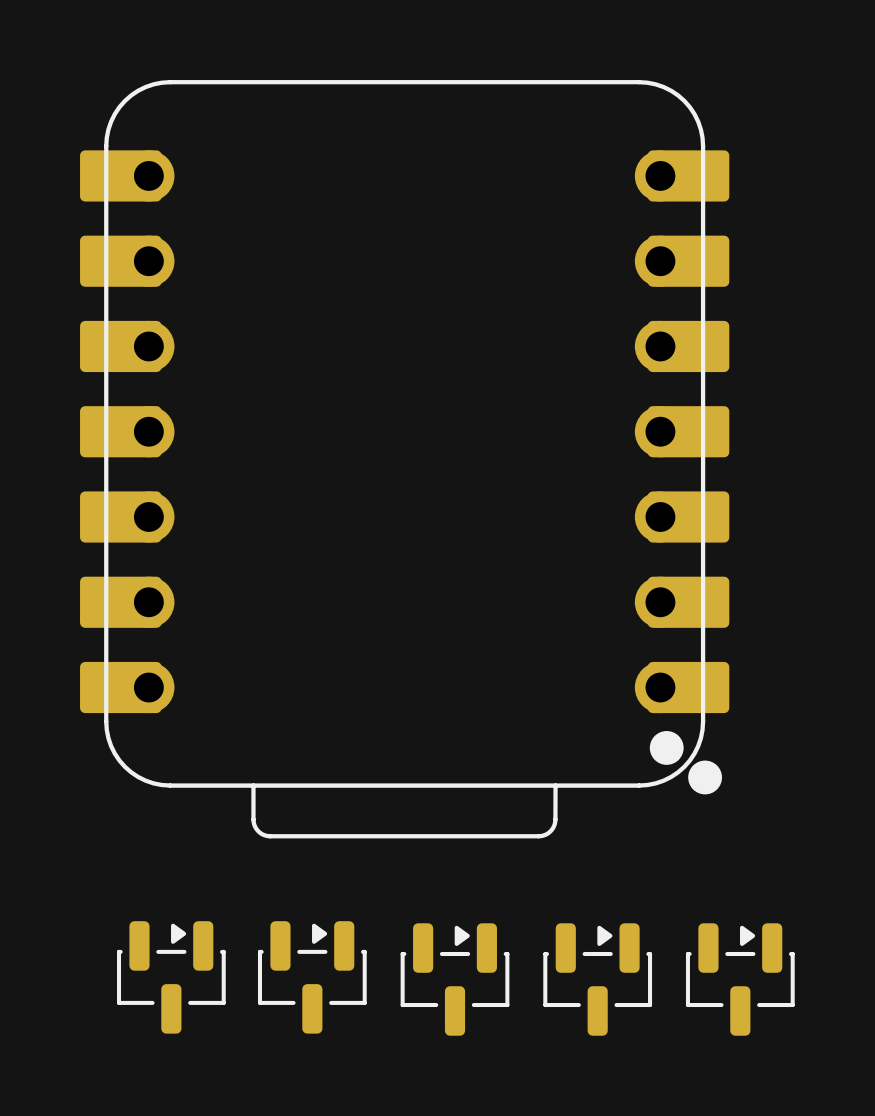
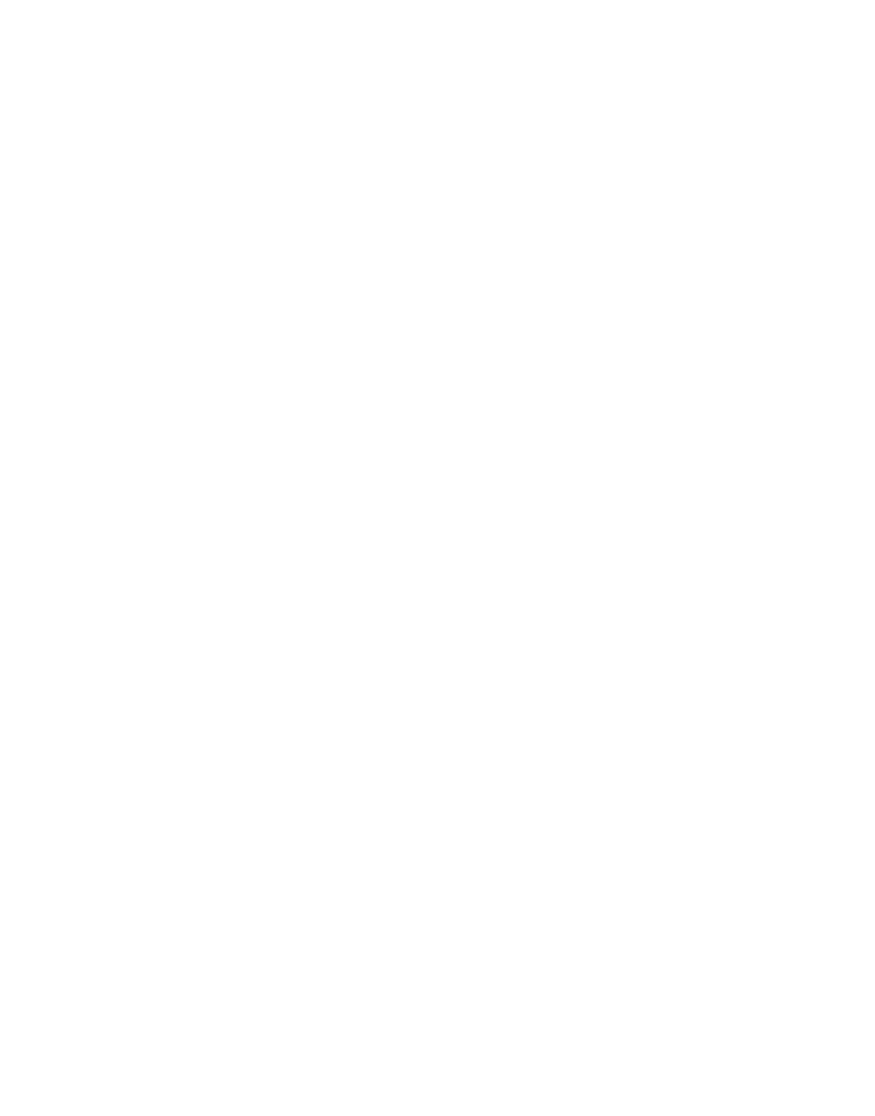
part: (404, 459) -> none
part: (171, 977) -> none
part: (312, 977) -> none
part: (455, 979) -> none
part: (597, 979) -> none
part: (740, 979) -> none

